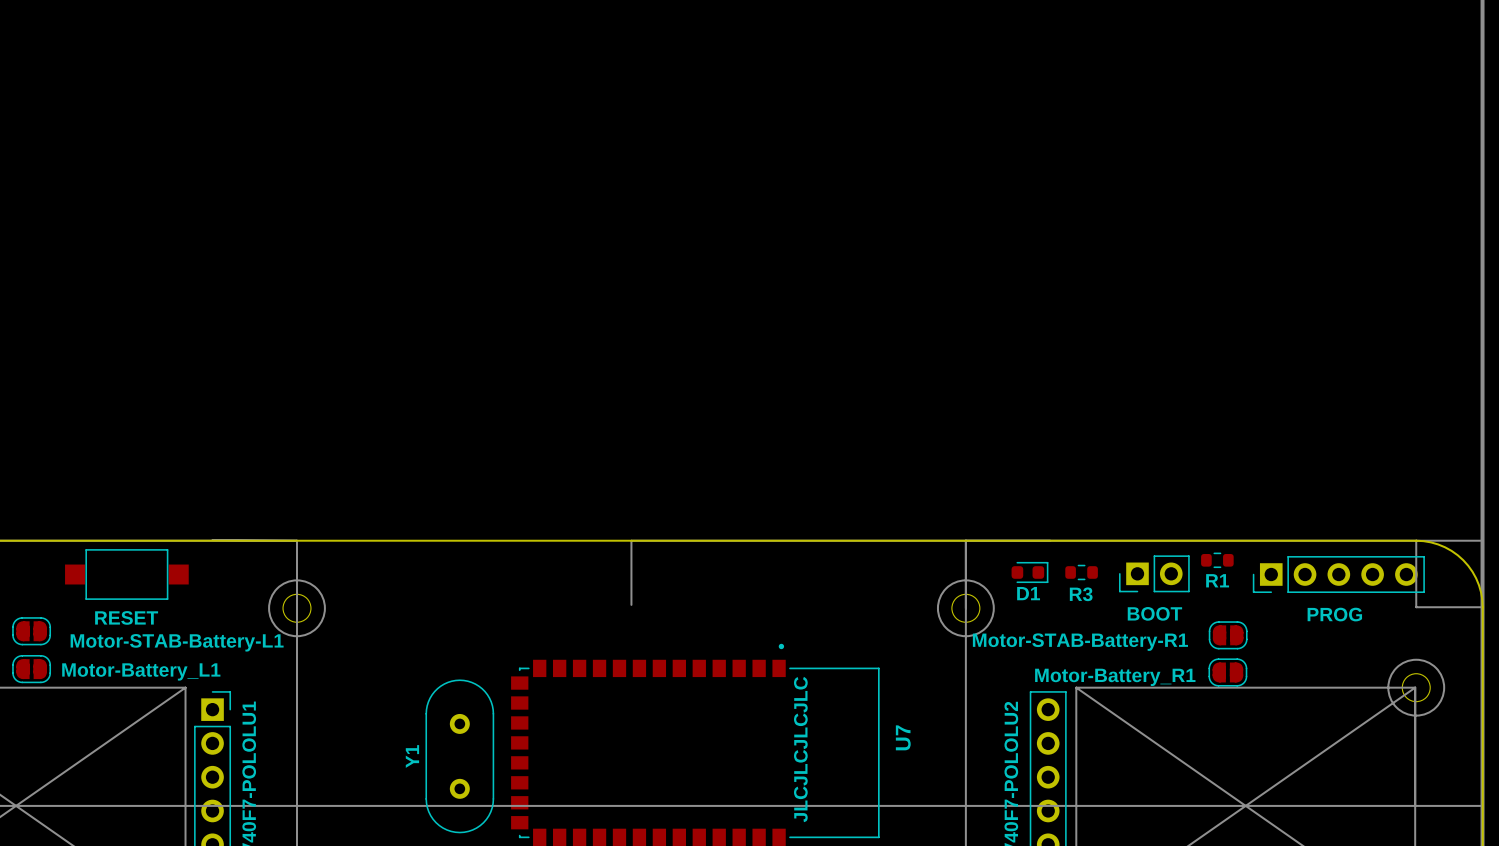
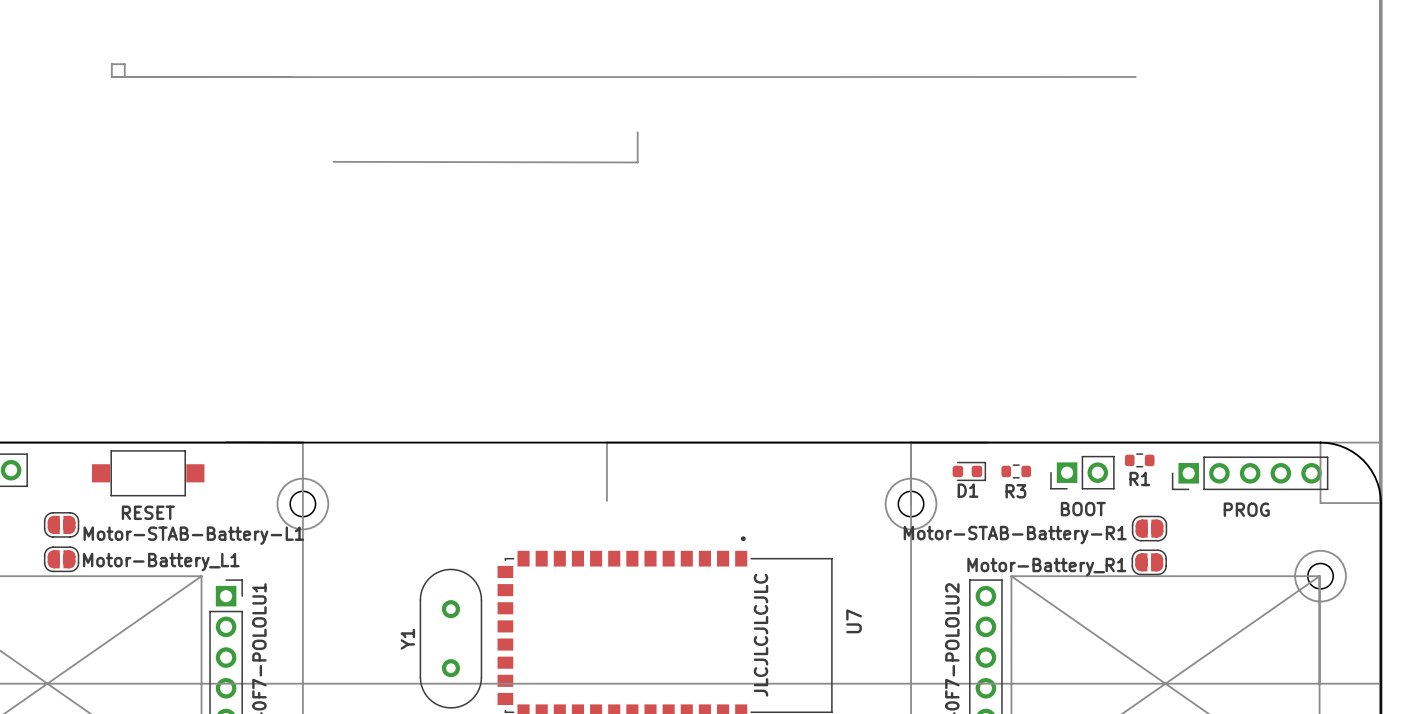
line: none -> (111, 77) (111, 64) (124, 64) (124, 77)
line: none -> (1135, 77) (111, 77)
line: none -> (637, 132) (637, 162) (333, 161)

